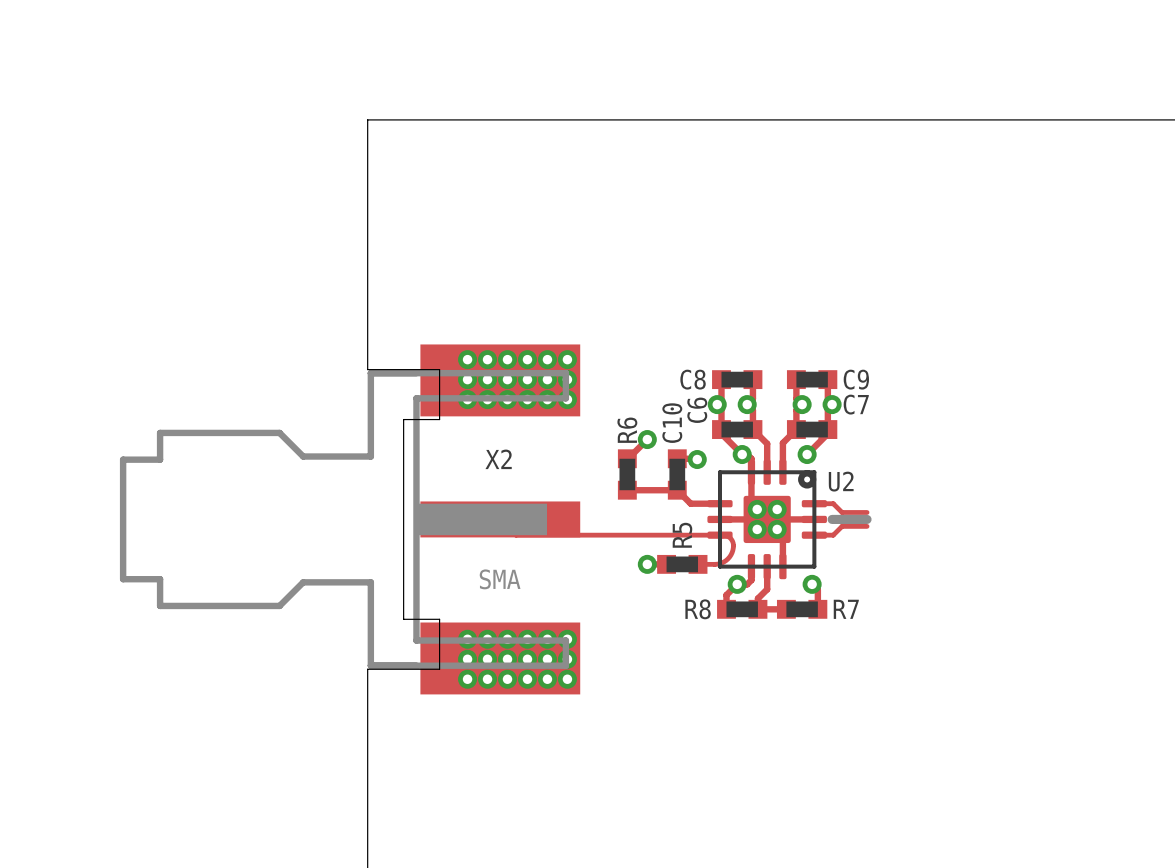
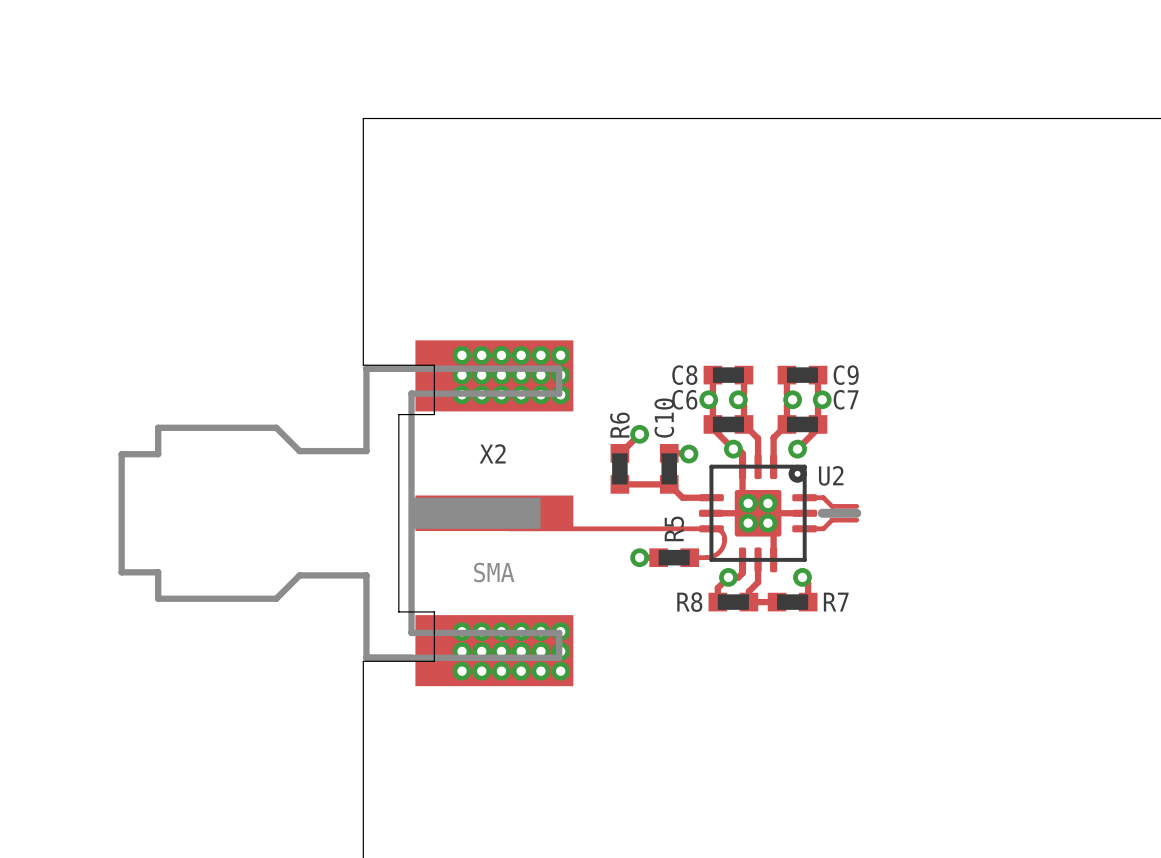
C6 name rotation: 0° (697, 410) -> 90° clockwise (684, 399)

